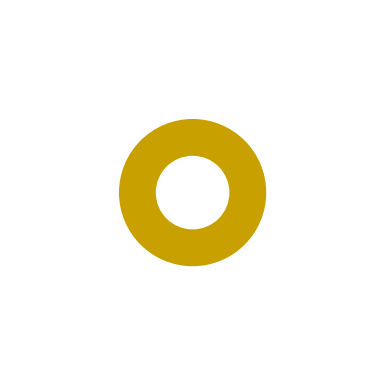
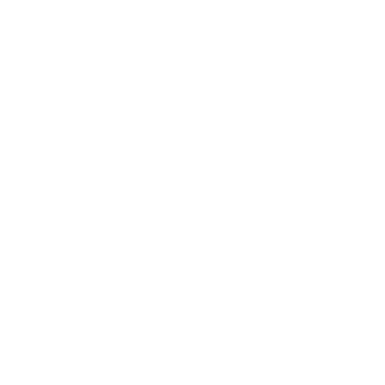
part: (192, 192) -> none

